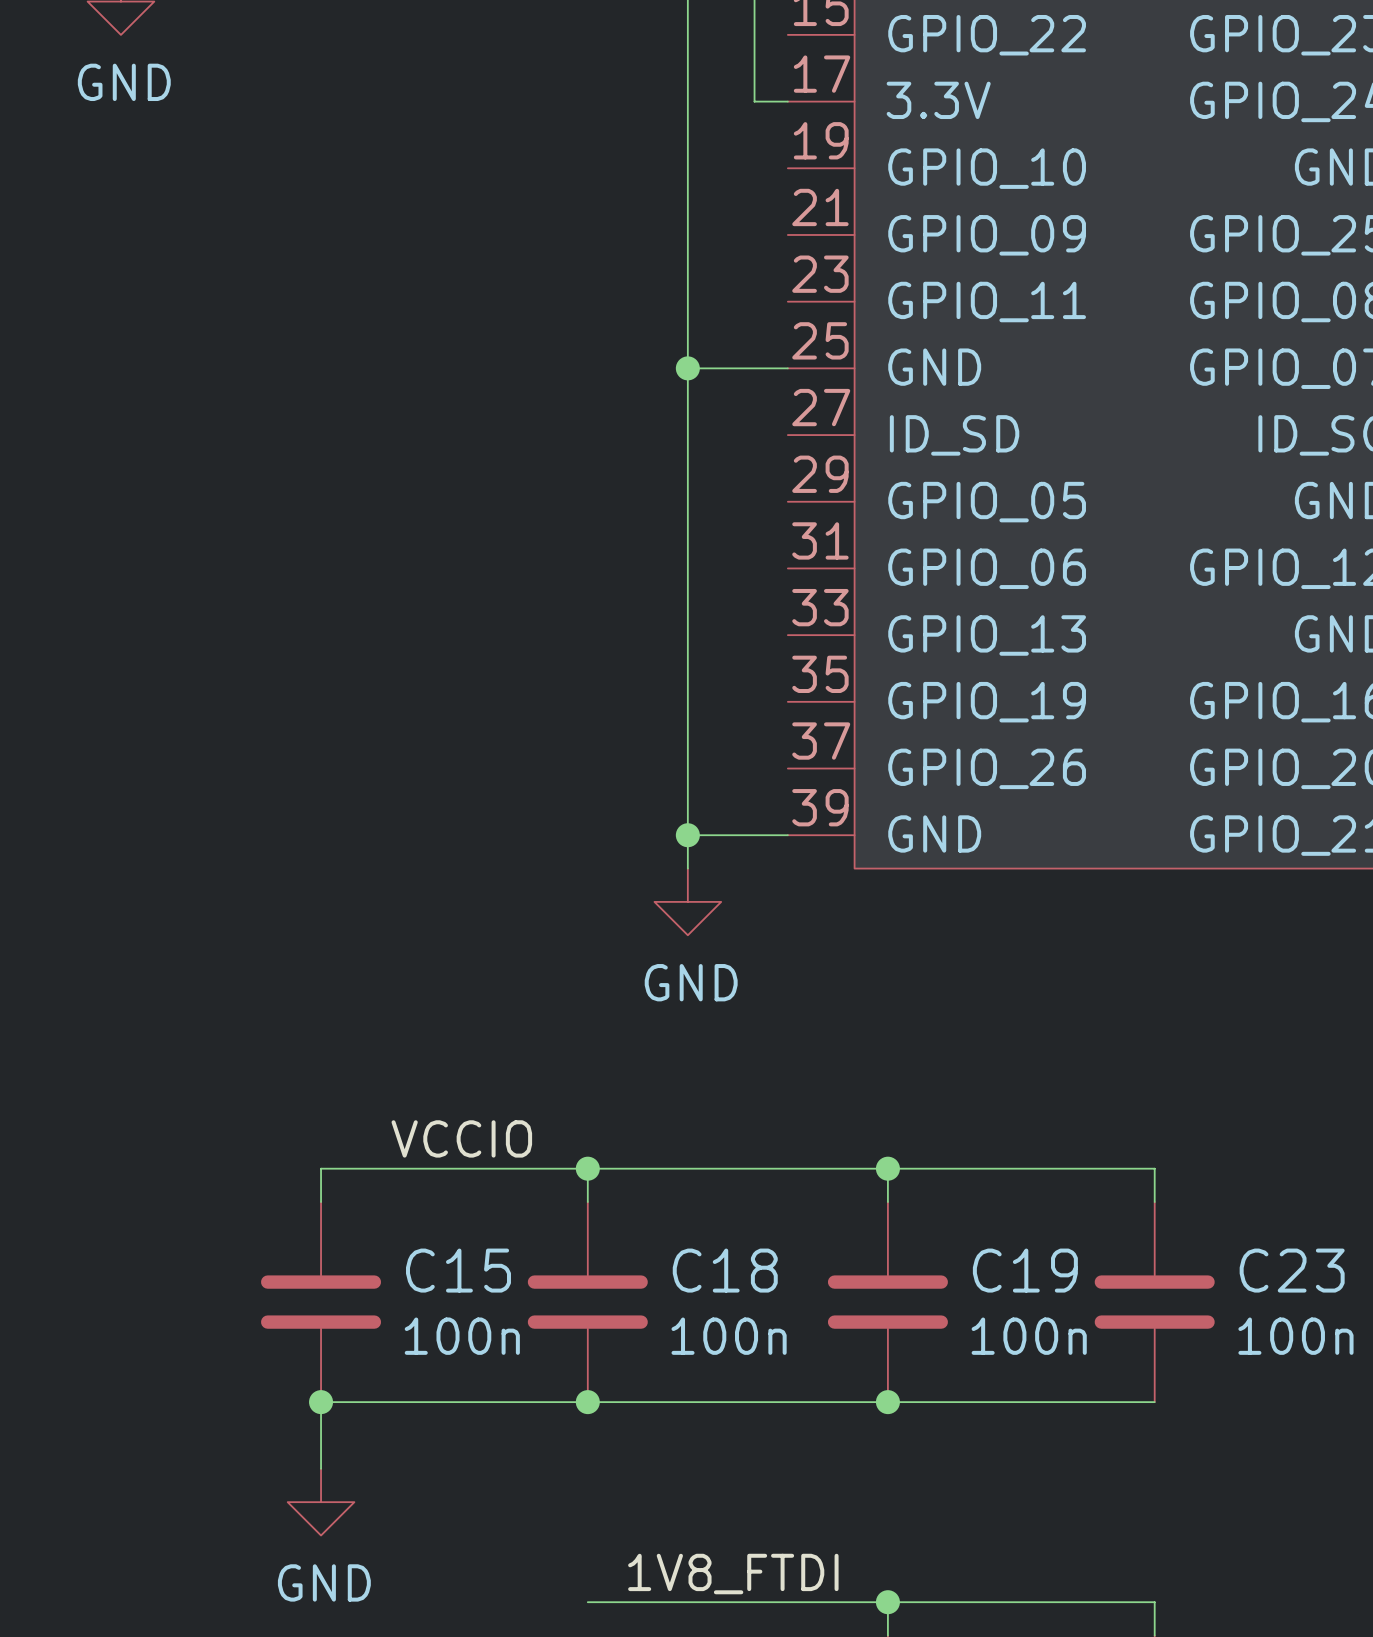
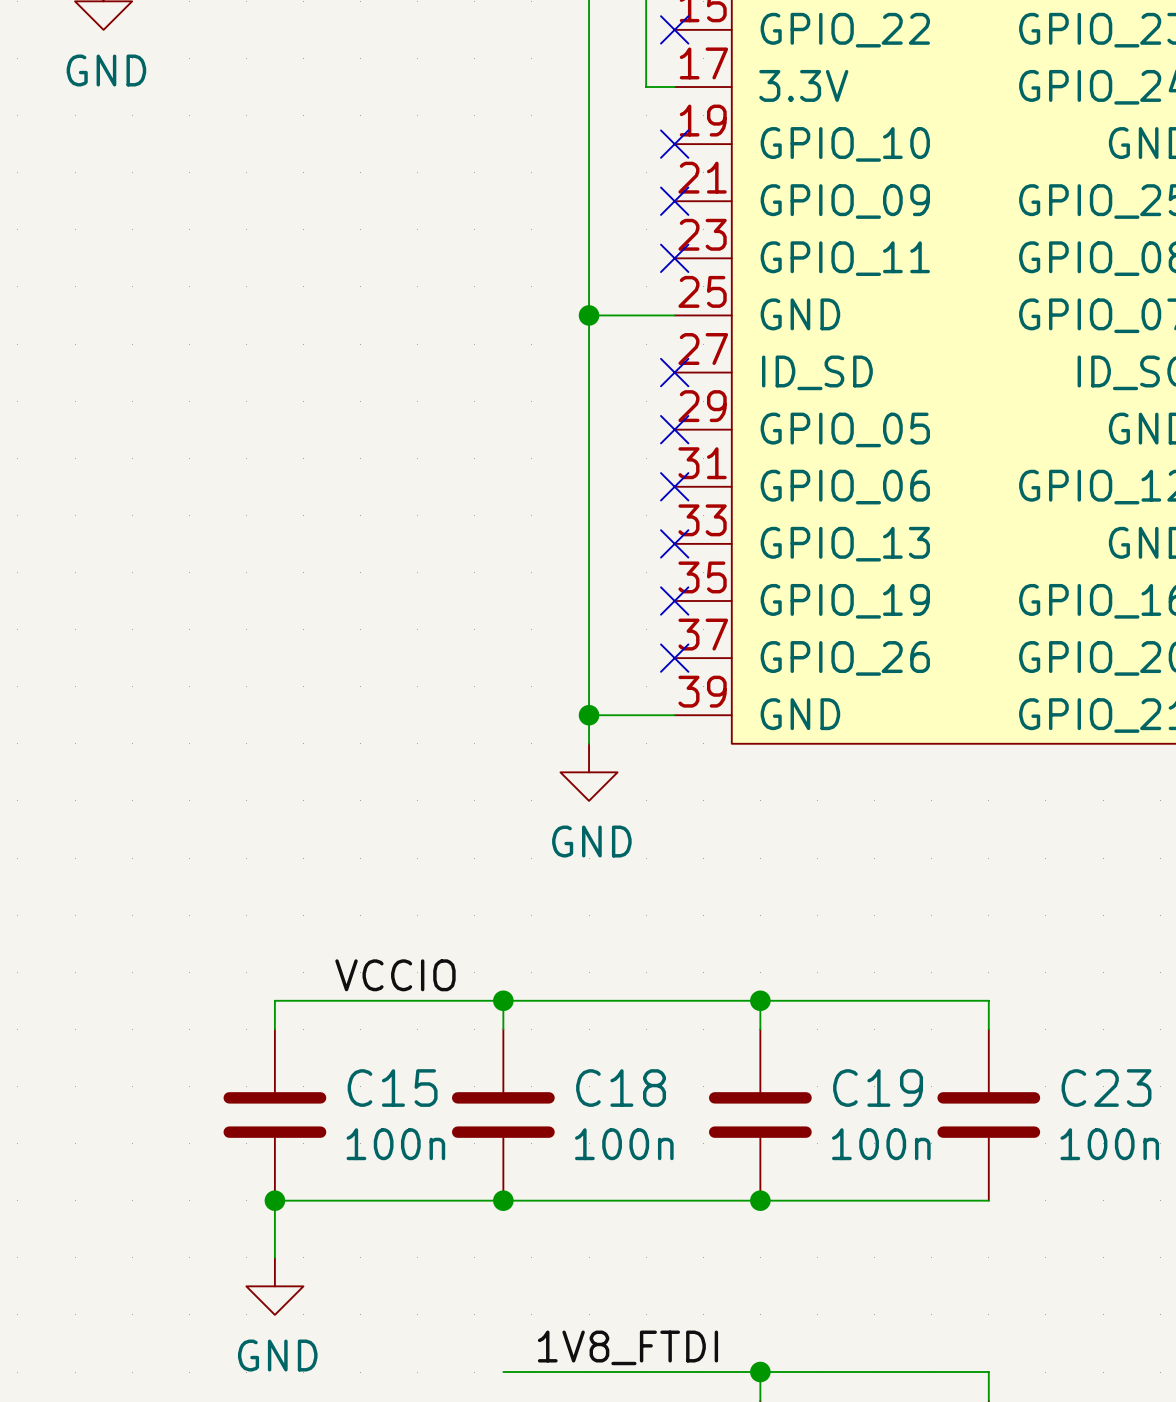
no-connect mark: none -> (674, 29)
no-connect mark: none -> (674, 144)
no-connect mark: none -> (674, 201)
no-connect mark: none -> (674, 258)
no-connect mark: none -> (674, 372)
no-connect mark: none -> (674, 429)
no-connect mark: none -> (674, 486)
no-connect mark: none -> (674, 543)
no-connect mark: none -> (674, 601)
no-connect mark: none -> (674, 658)

